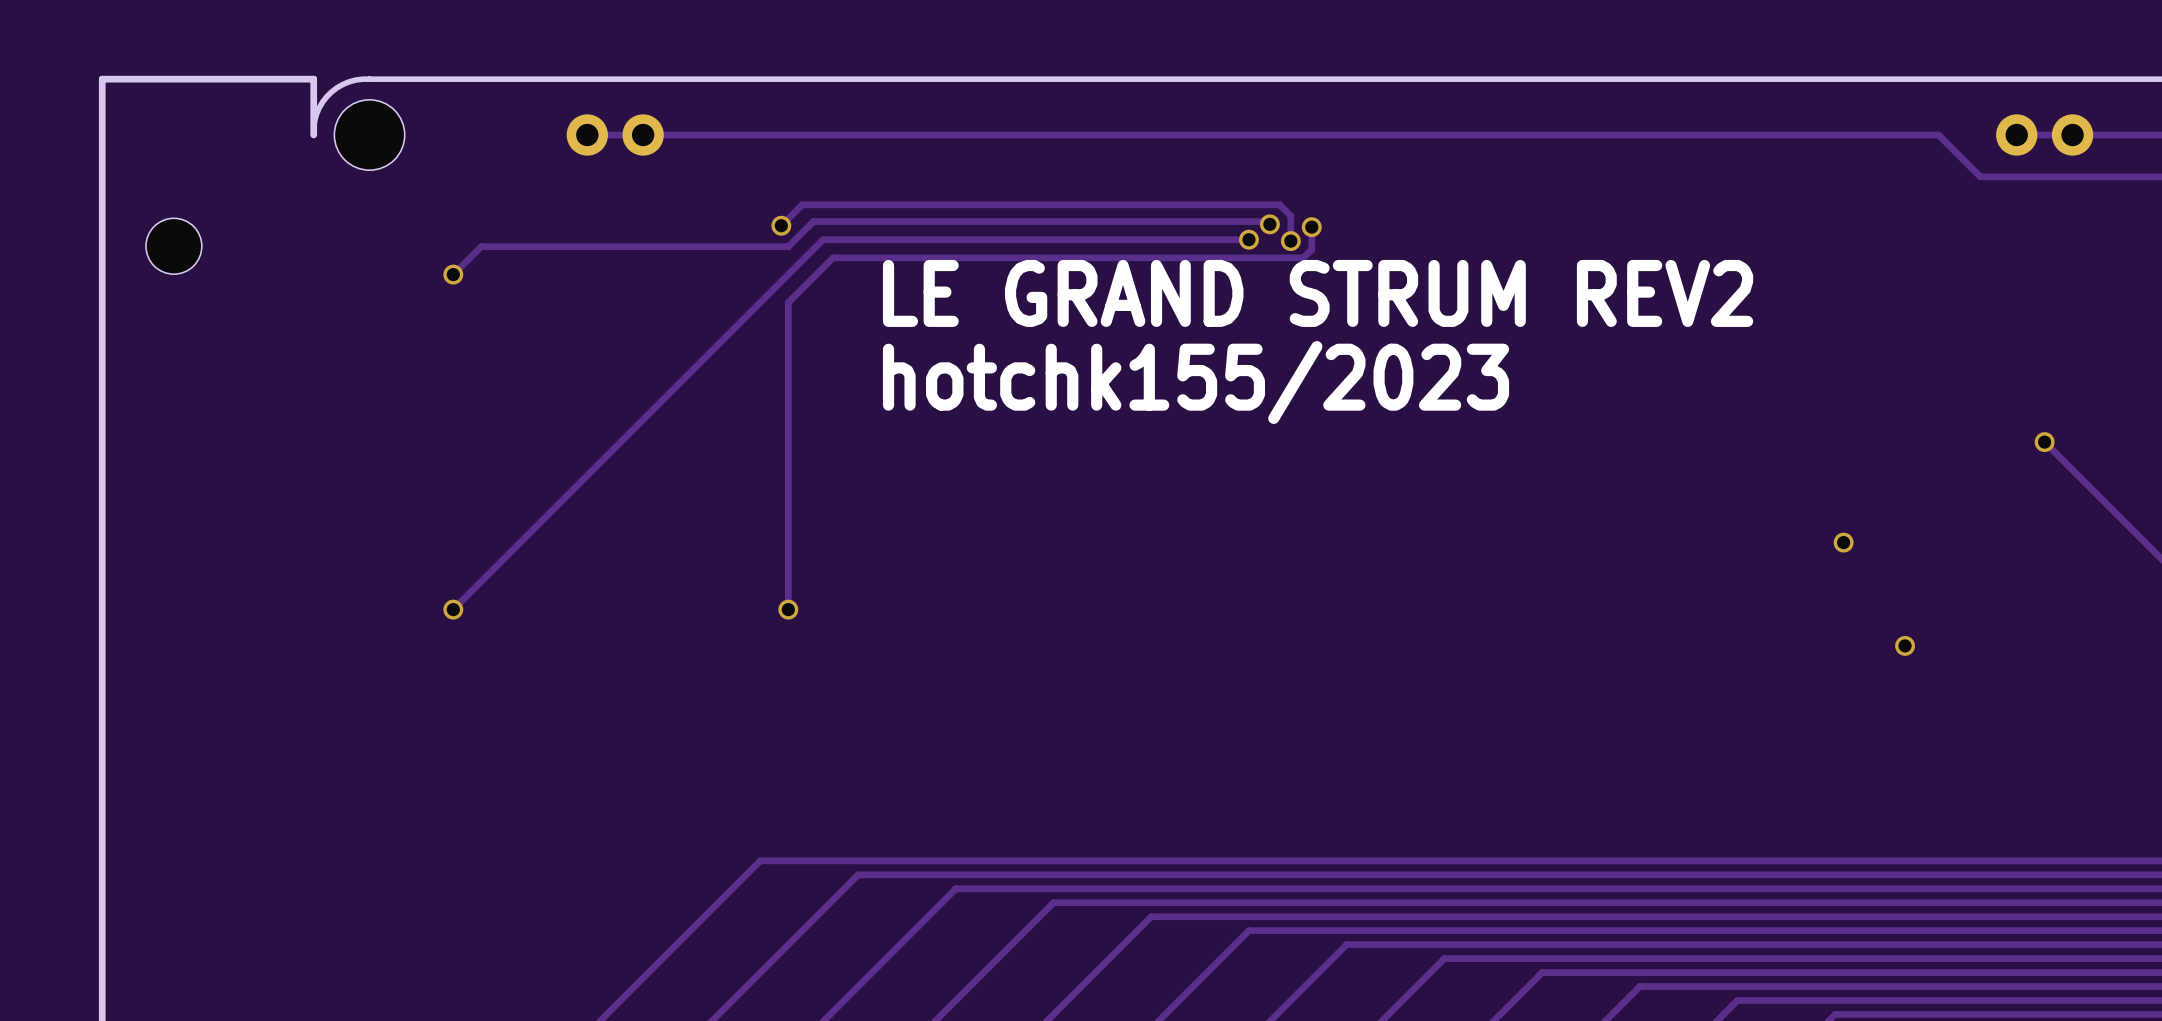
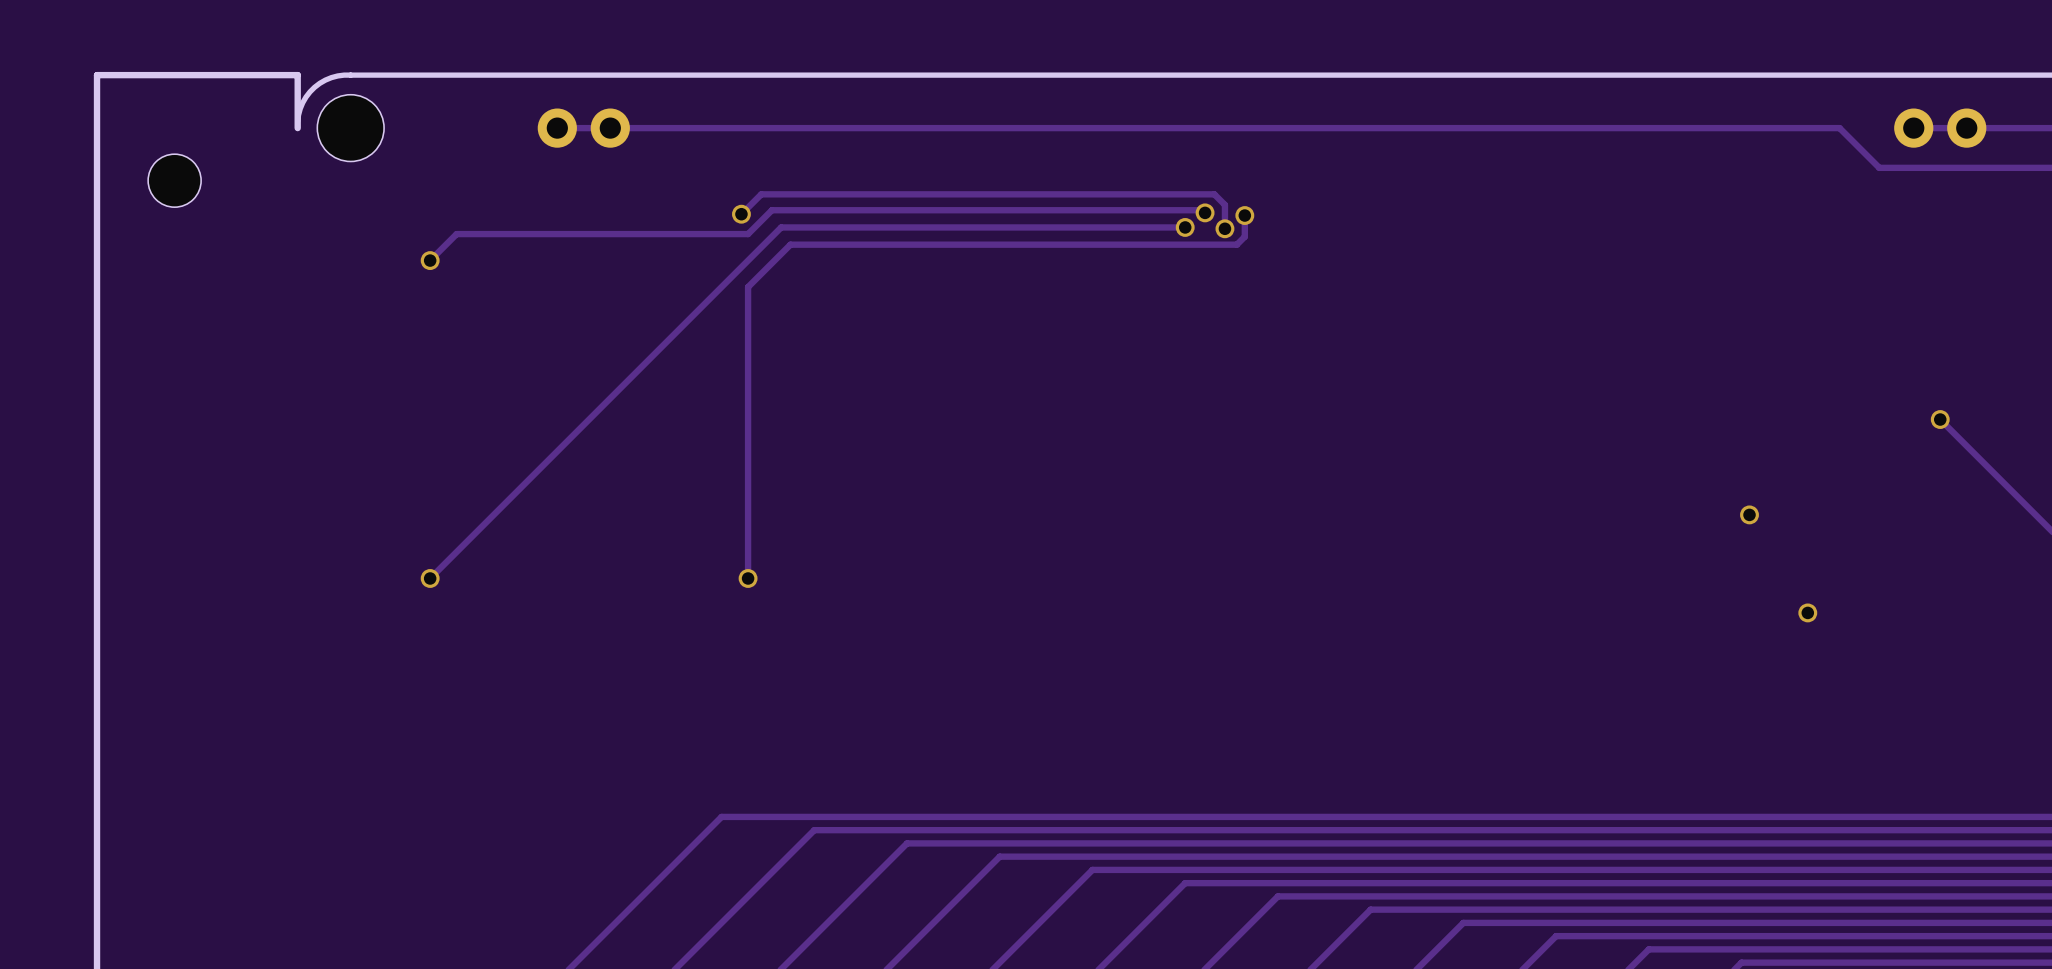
hole position: (173, 246) -> (174, 180)
text: LE GRAND STRUM REV2 (1318, 293) -> none
text: hotchk155/2023 (1196, 382) -> none

